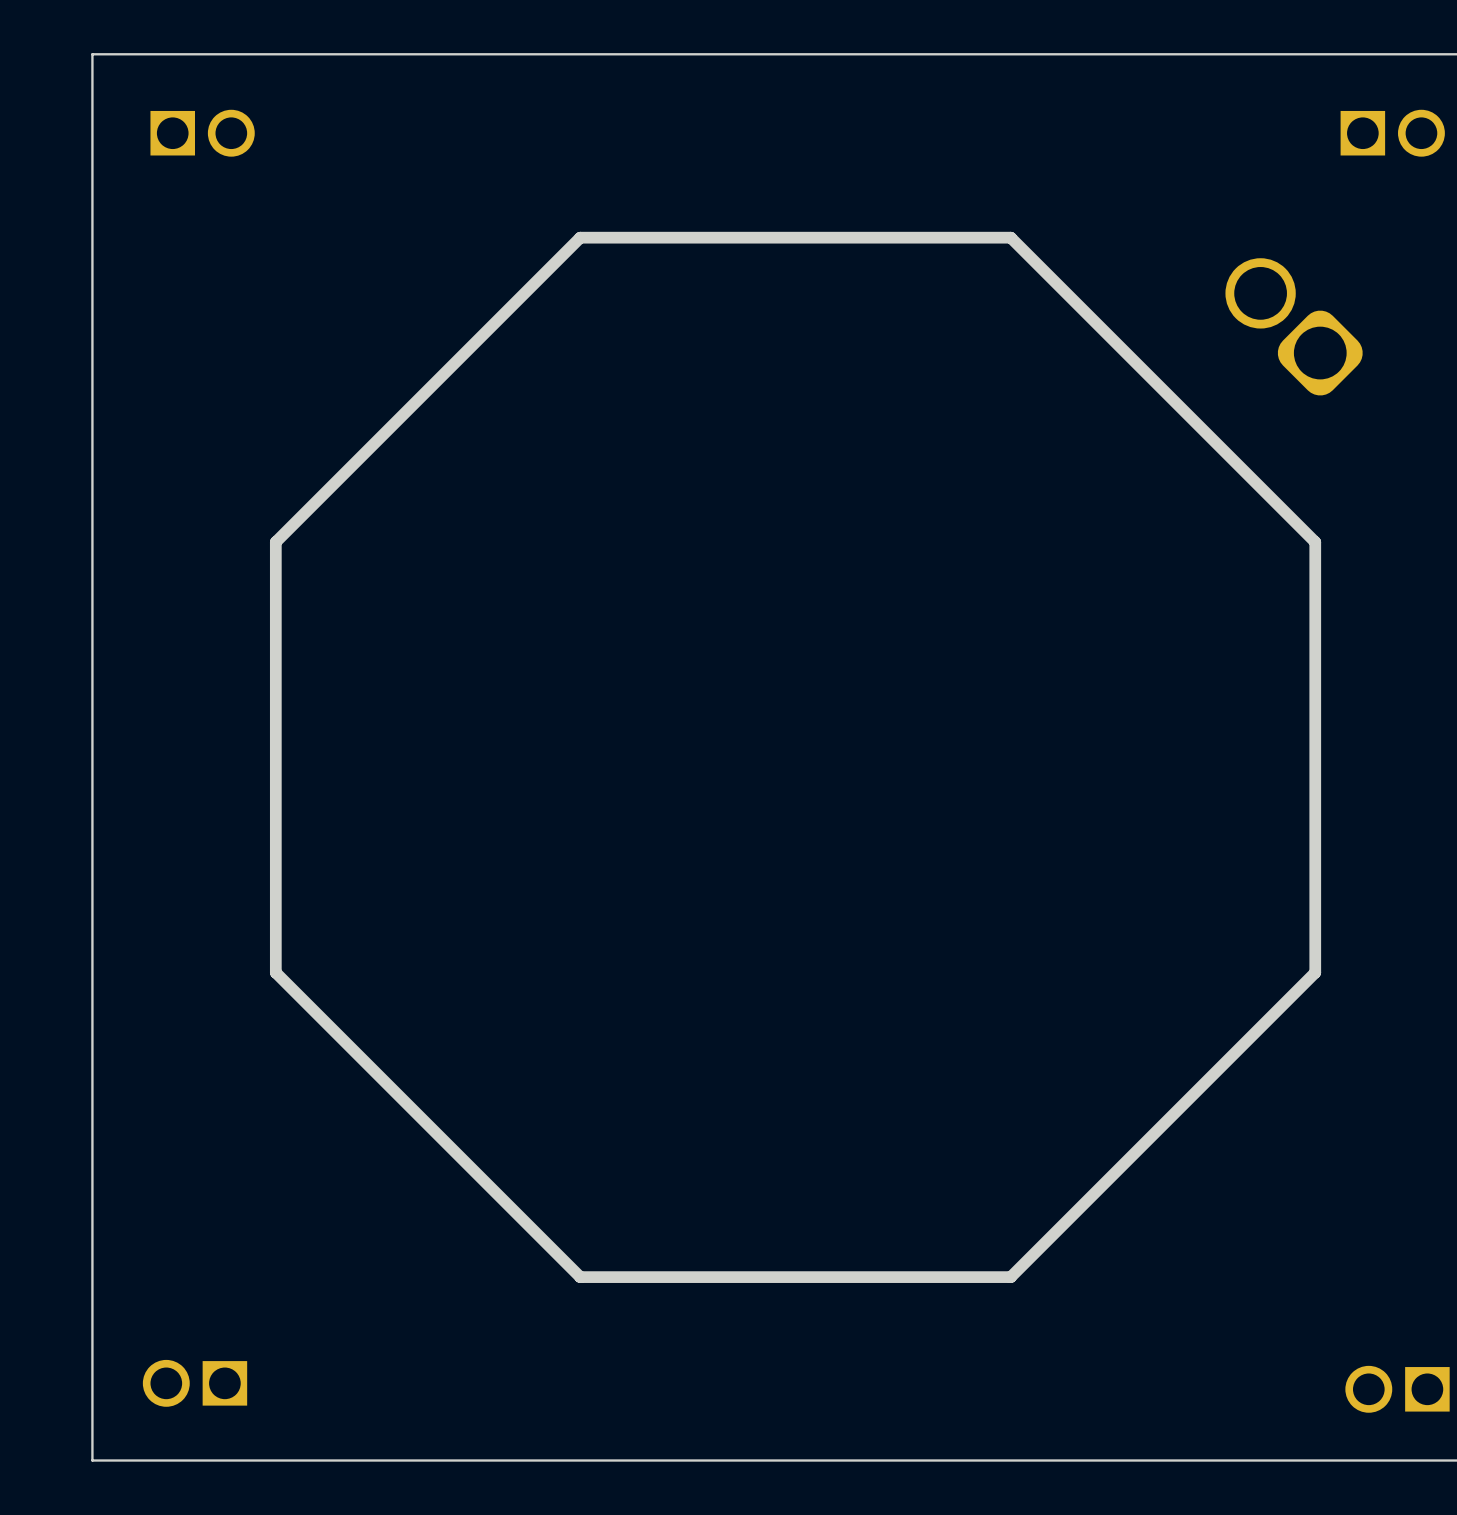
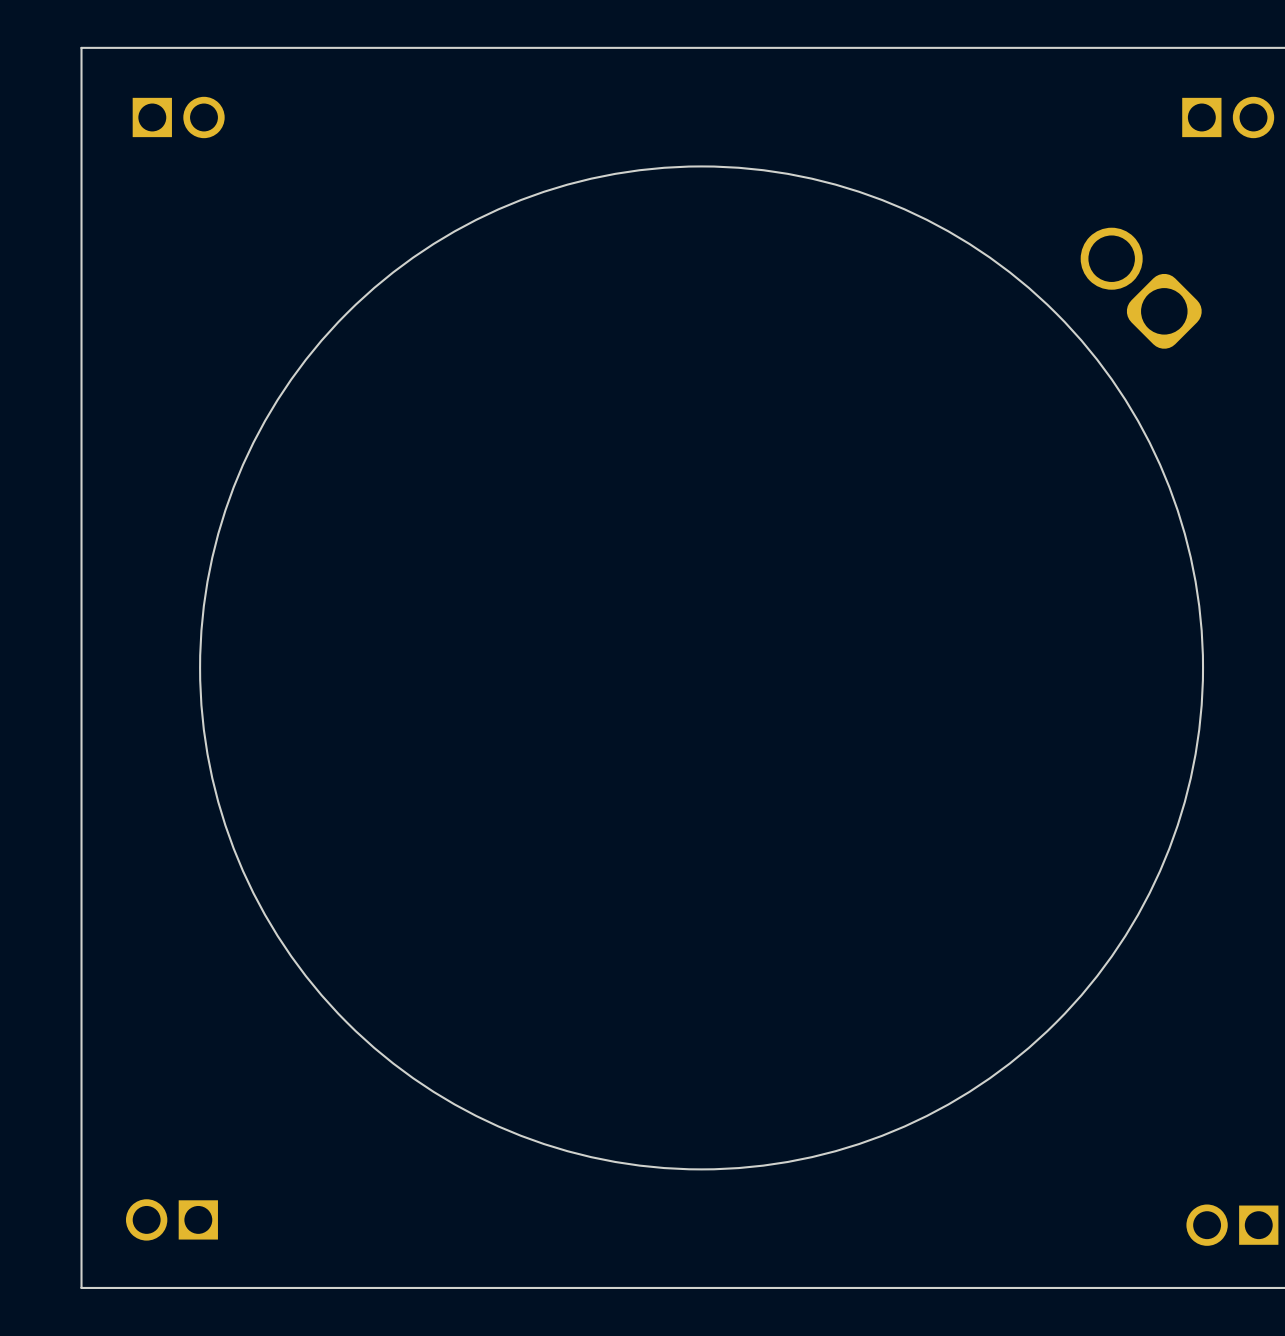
round board edge: none -> [199, 165, 1205, 1171]
board edge: (1010, 237) (1315, 542) (1315, 972) (1010, 1277) (580, 1277) (275, 972) (275, 542) (580, 237) (1010, 237) -> none

